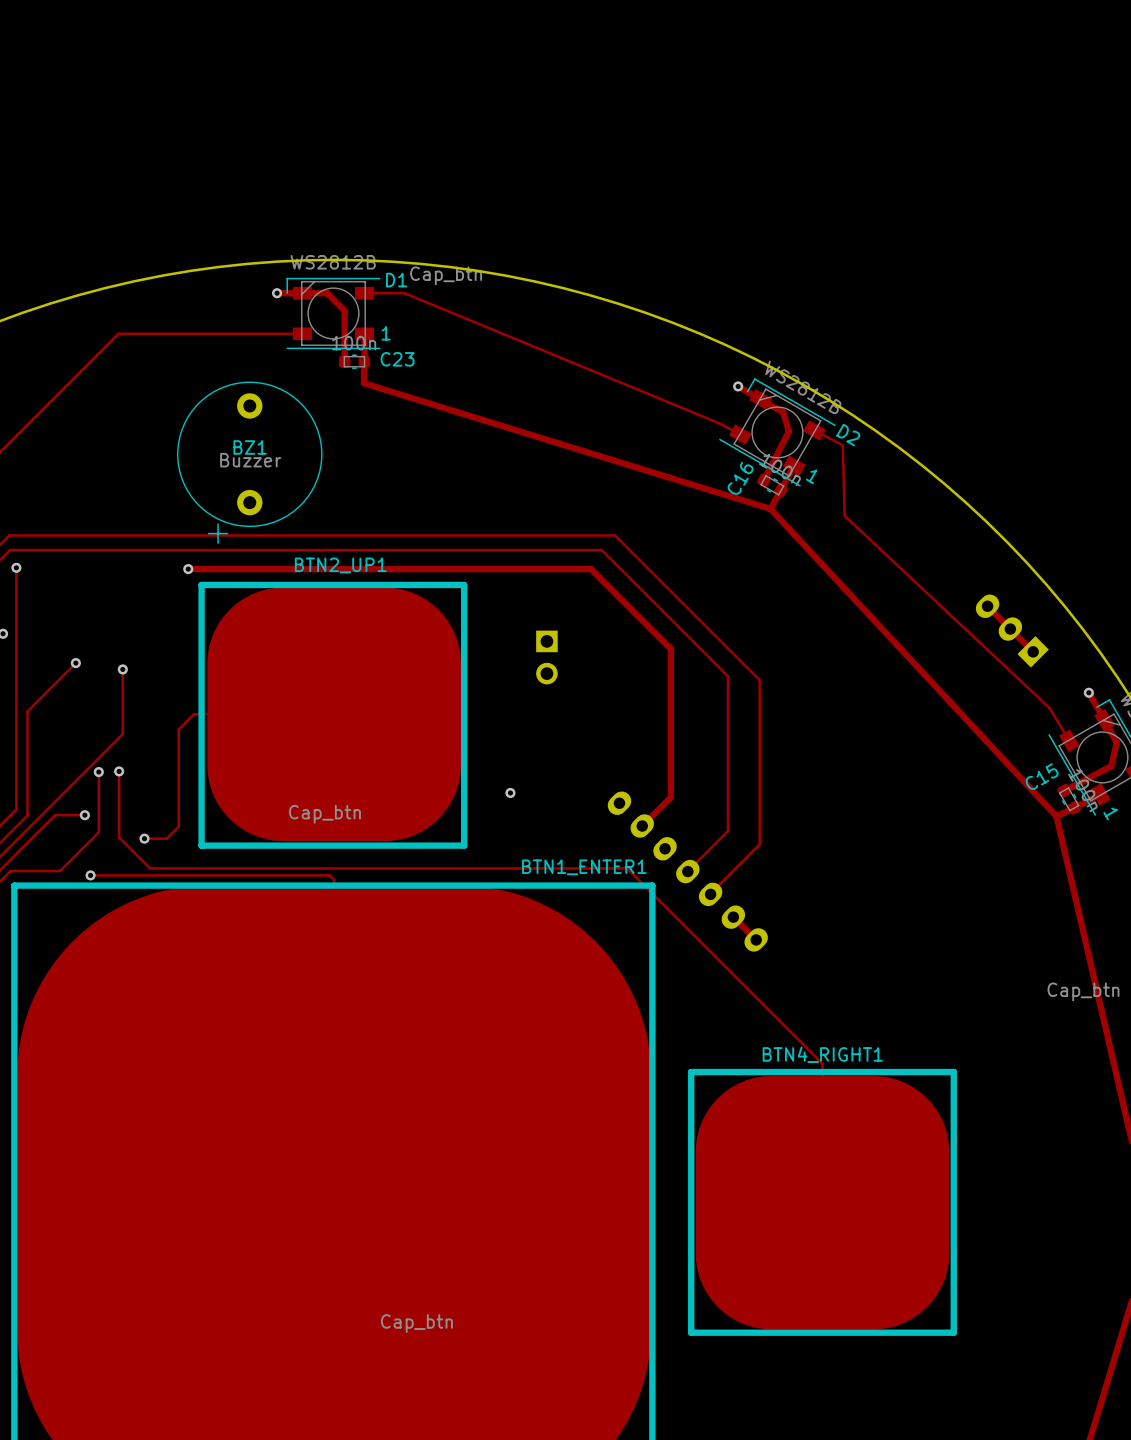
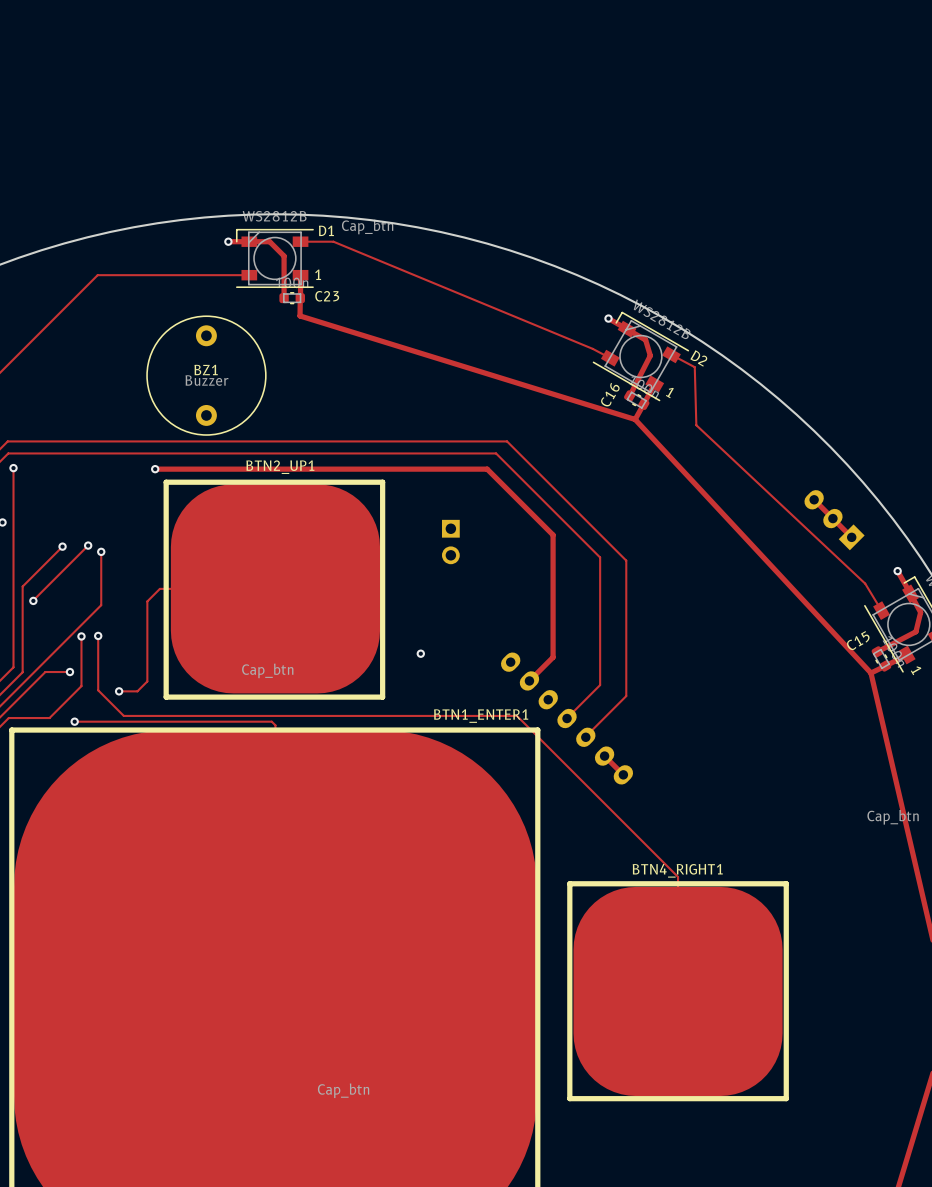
BZ1 footprint: [177, 381, 323, 544] -> [146, 315, 267, 436]
track: none -> (88, 545) (33, 600)
via: none -> (88, 545)
via: none -> (33, 600)

